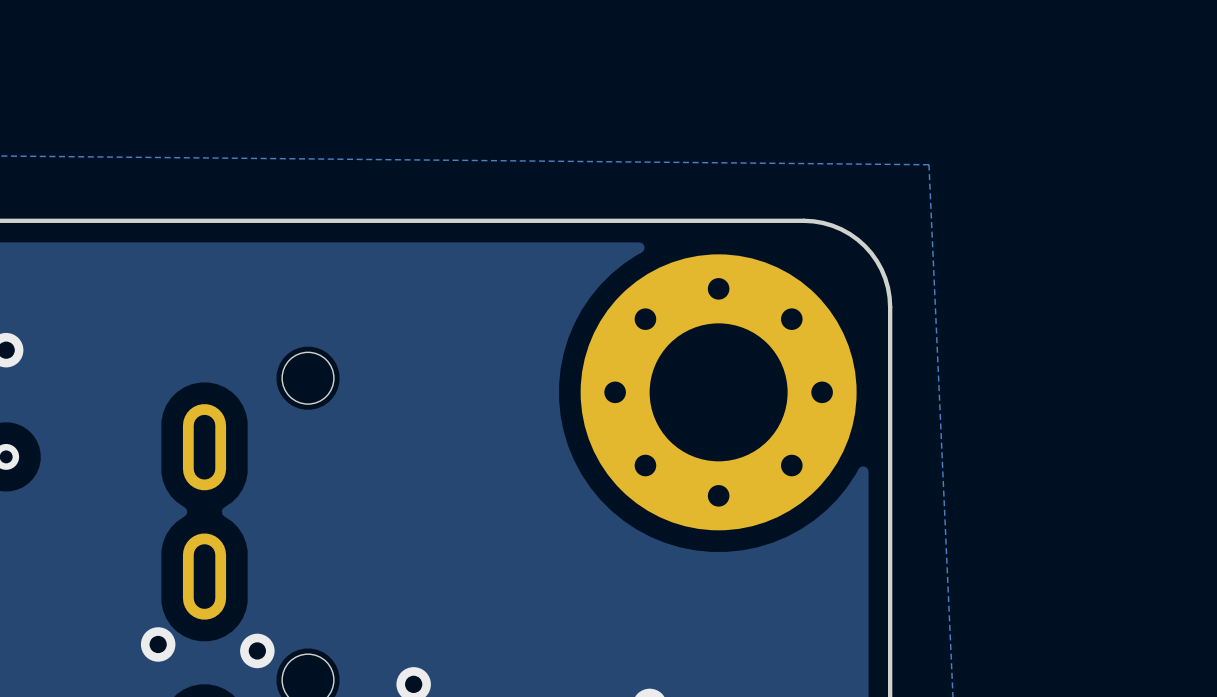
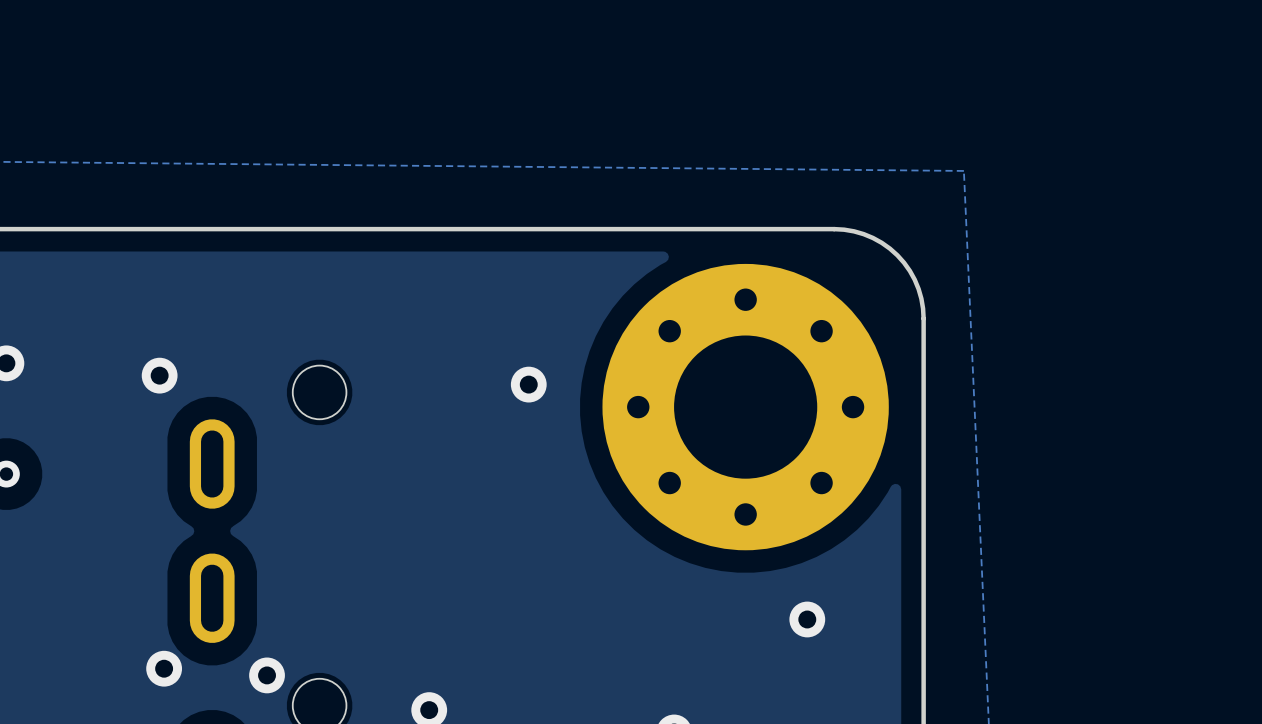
via: none -> (159, 375)
via: none -> (528, 384)
via: none -> (807, 619)

